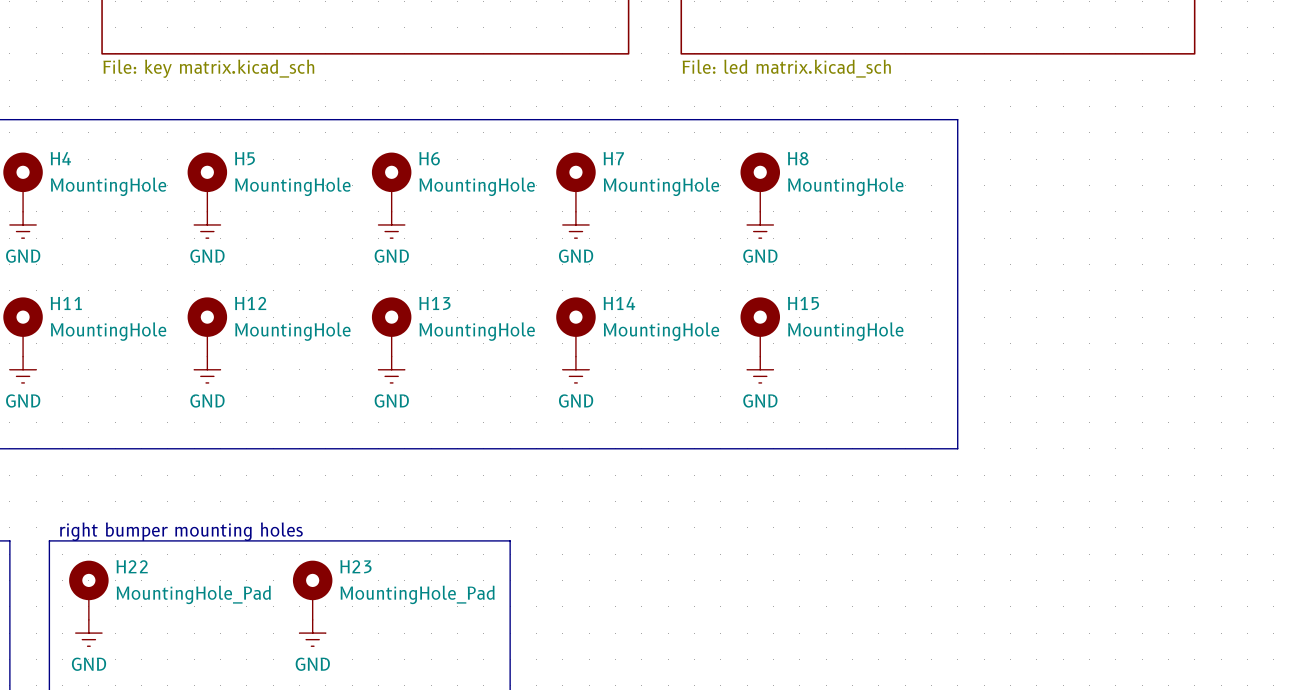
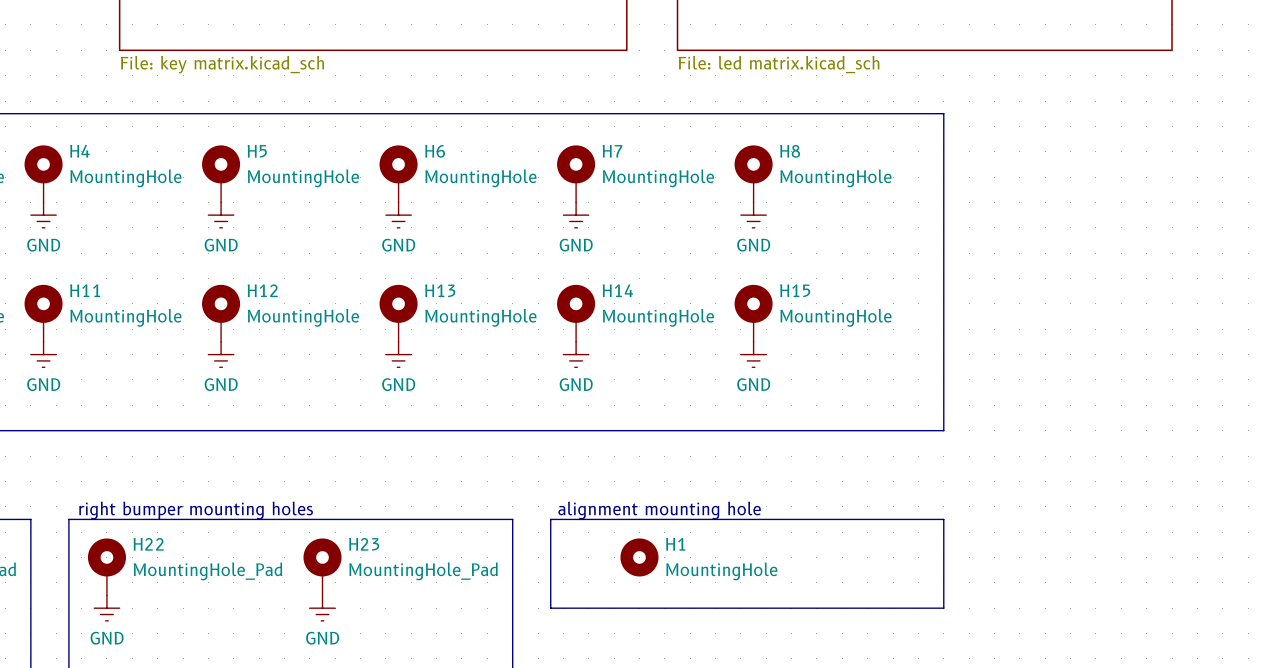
text: none -> alignment mounting hole (659, 510)
line: none -> (550, 519) (943, 519) (943, 608) (550, 608) (550, 519)
H1: none -> MountingHole (639, 557)

